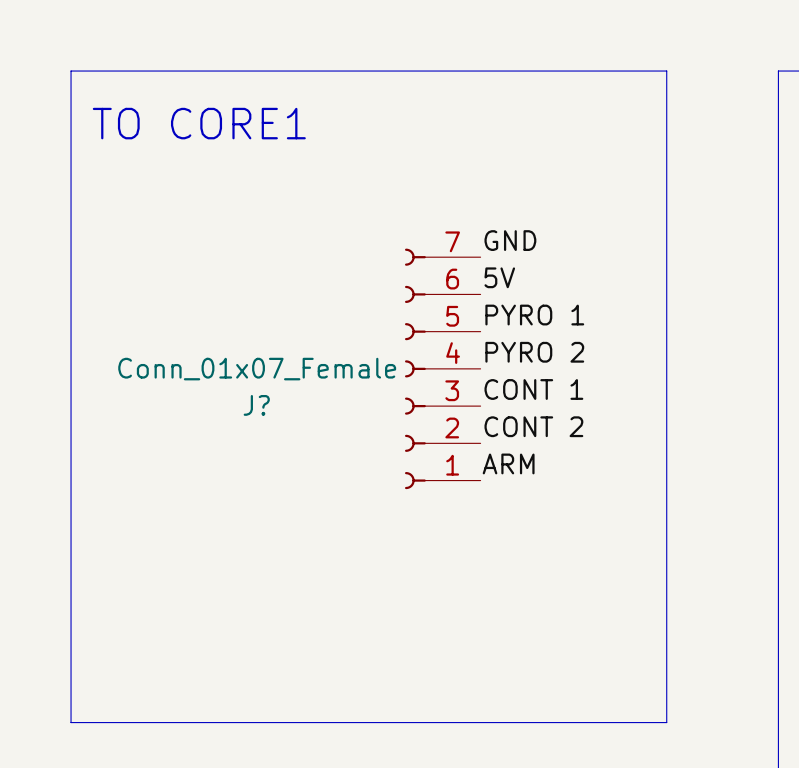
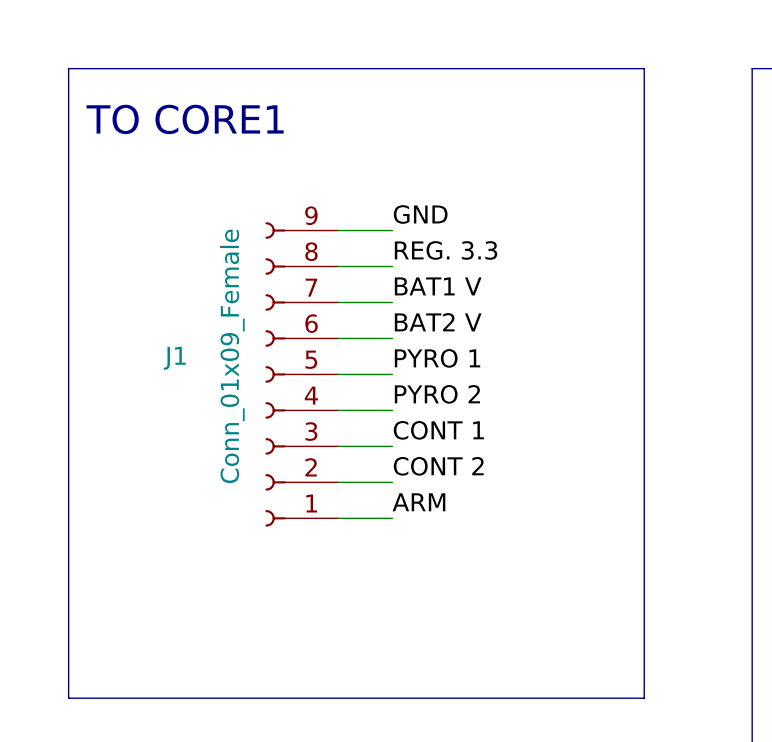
wire: none -> (338, 230) (392, 230)
label position: GND (510, 240) -> GND (420, 214)
label: none -> REG. 3.3 (446, 250)
wire: none -> (338, 266) (392, 266)
label: 5V (499, 277) -> none
label: none -> BAT1 V (438, 286)
wire: none -> (338, 302) (392, 302)
label position: PYRO 1 (534, 315) -> PYRO 1 (437, 358)
label: none -> BAT2 V (438, 322)
wire: none -> (338, 338) (392, 338)
label position: PYRO 2 (534, 352) -> PYRO 2 (437, 394)
J?: Conn_01x07_Female (442, 368) -> none
J1: none -> Conn_01x09_Female (301, 374)
wire: none -> (338, 374) (392, 374)
label position: CONT 1 (533, 389) -> CONT 1 (438, 430)
wire: none -> (338, 410) (392, 410)
label position: CONT 2 (533, 426) -> CONT 2 (438, 466)
wire: none -> (338, 446) (392, 446)
label position: ARM (508, 463) -> ARM (418, 502)
wire: none -> (338, 482) (392, 482)
wire: none -> (338, 518) (392, 518)

